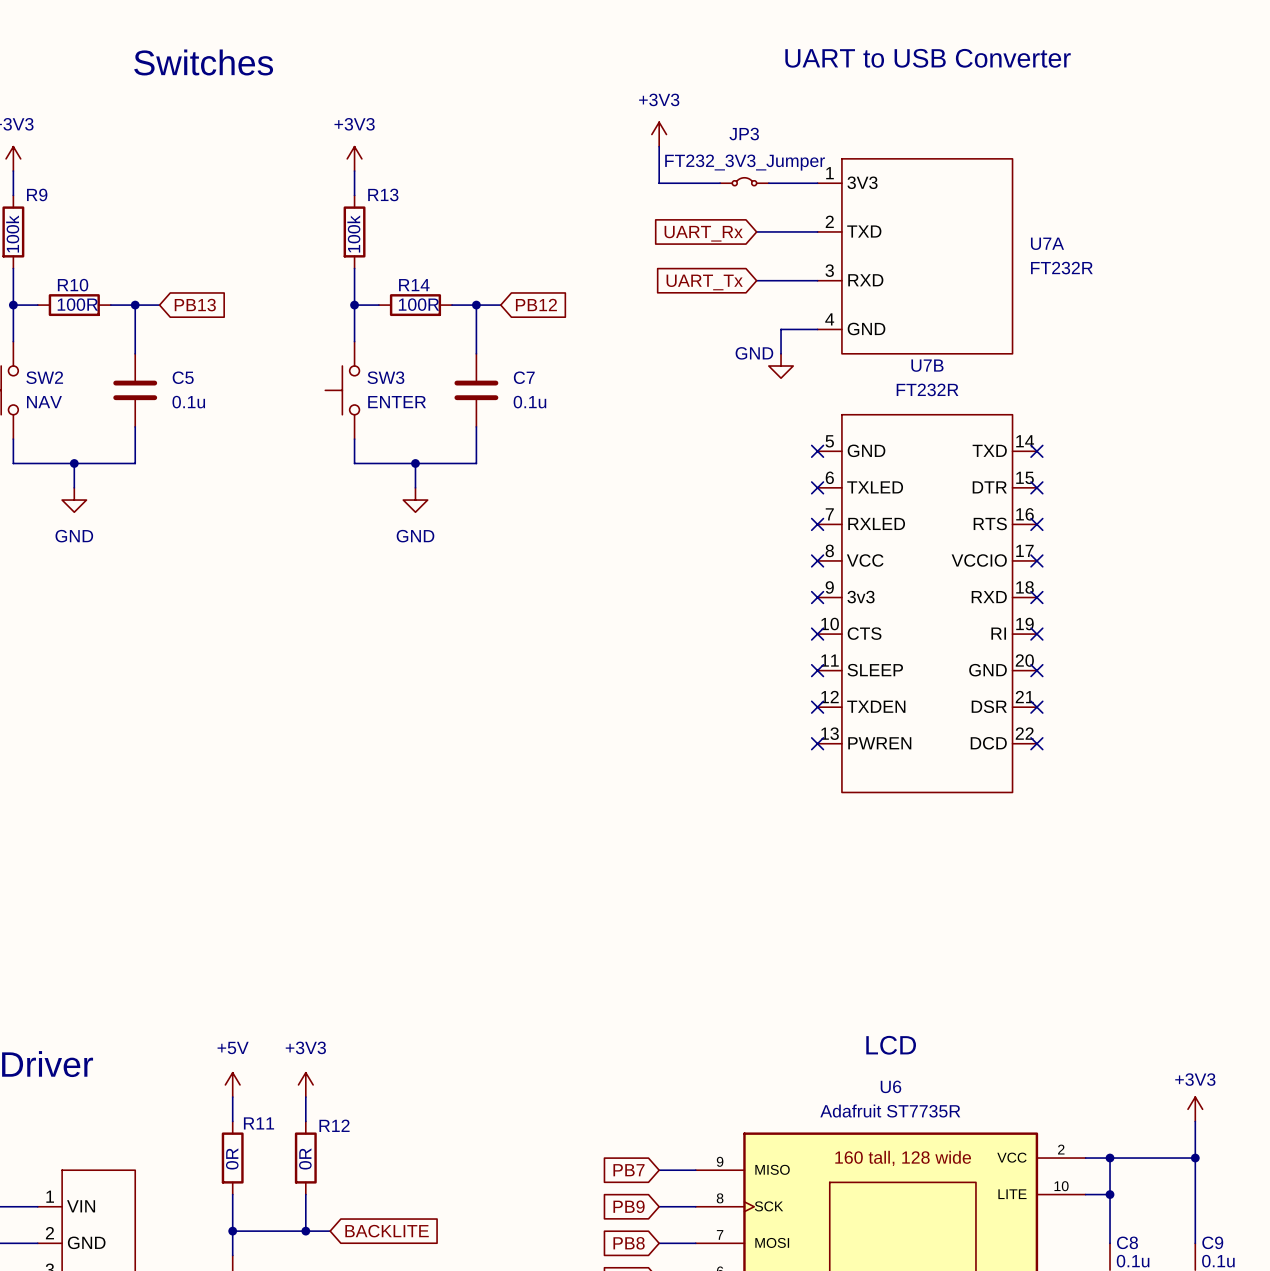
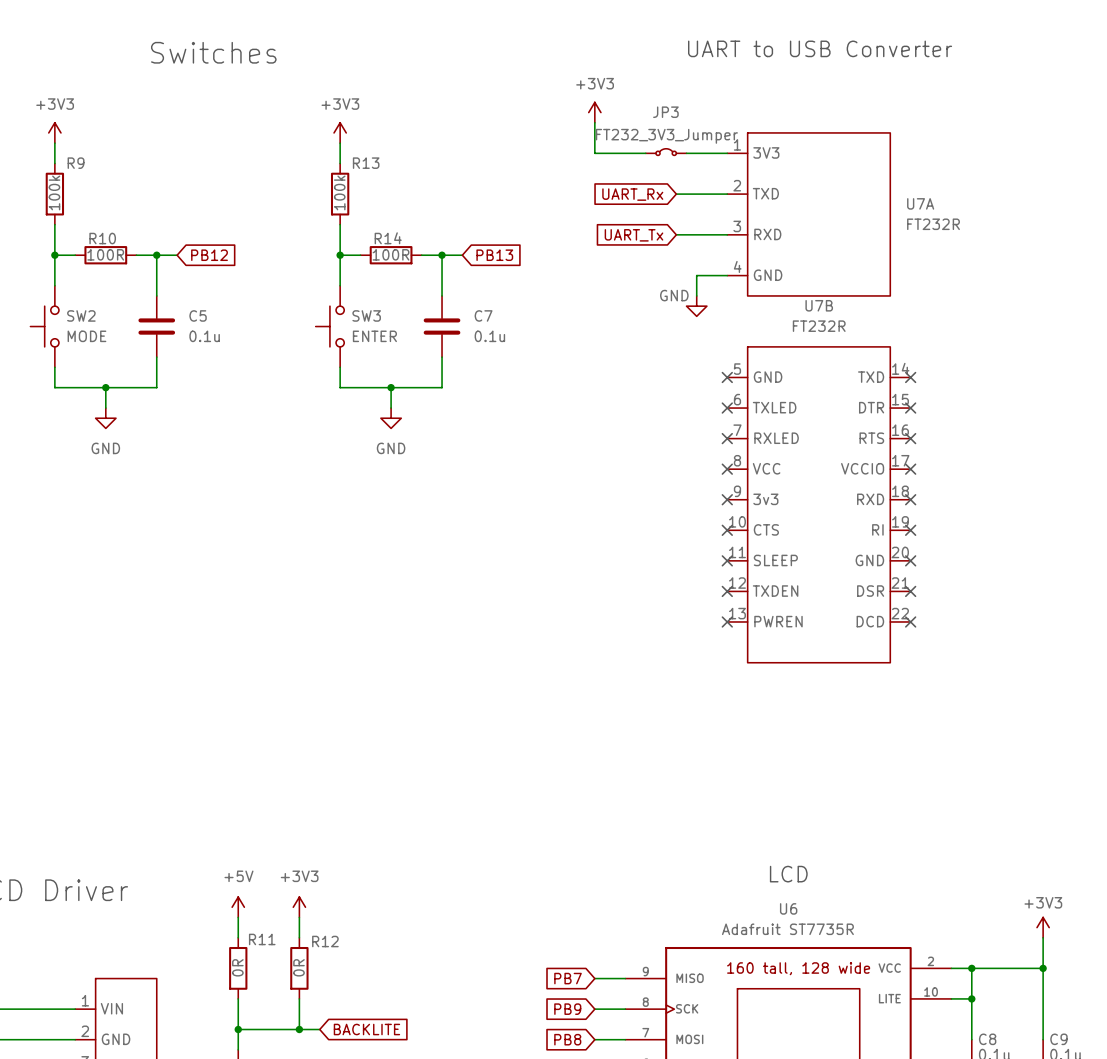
global label: PB12 (536, 304) -> PB13 (494, 255)
global label: PB13 (195, 305) -> PB12 (209, 255)
SW2 value: NAV (44, 402) -> MODE (86, 336)

